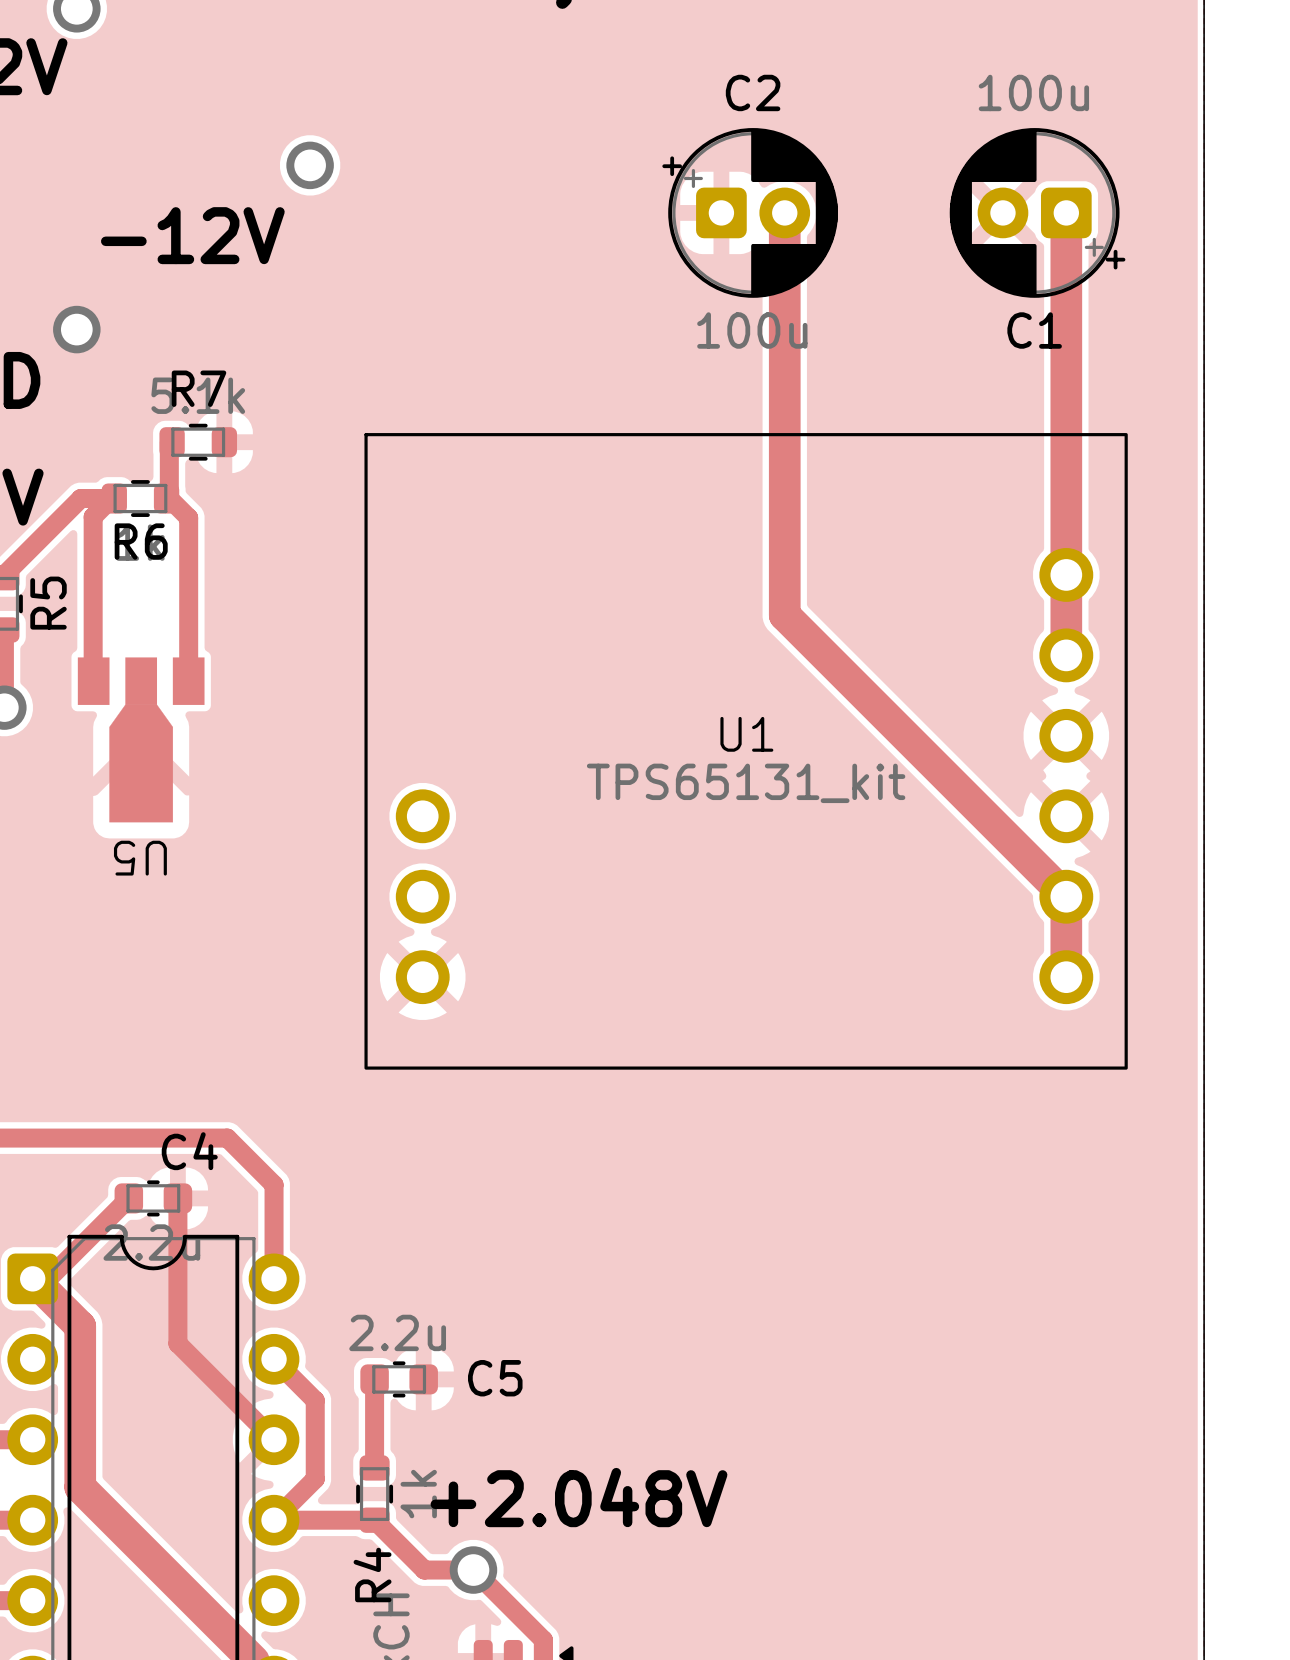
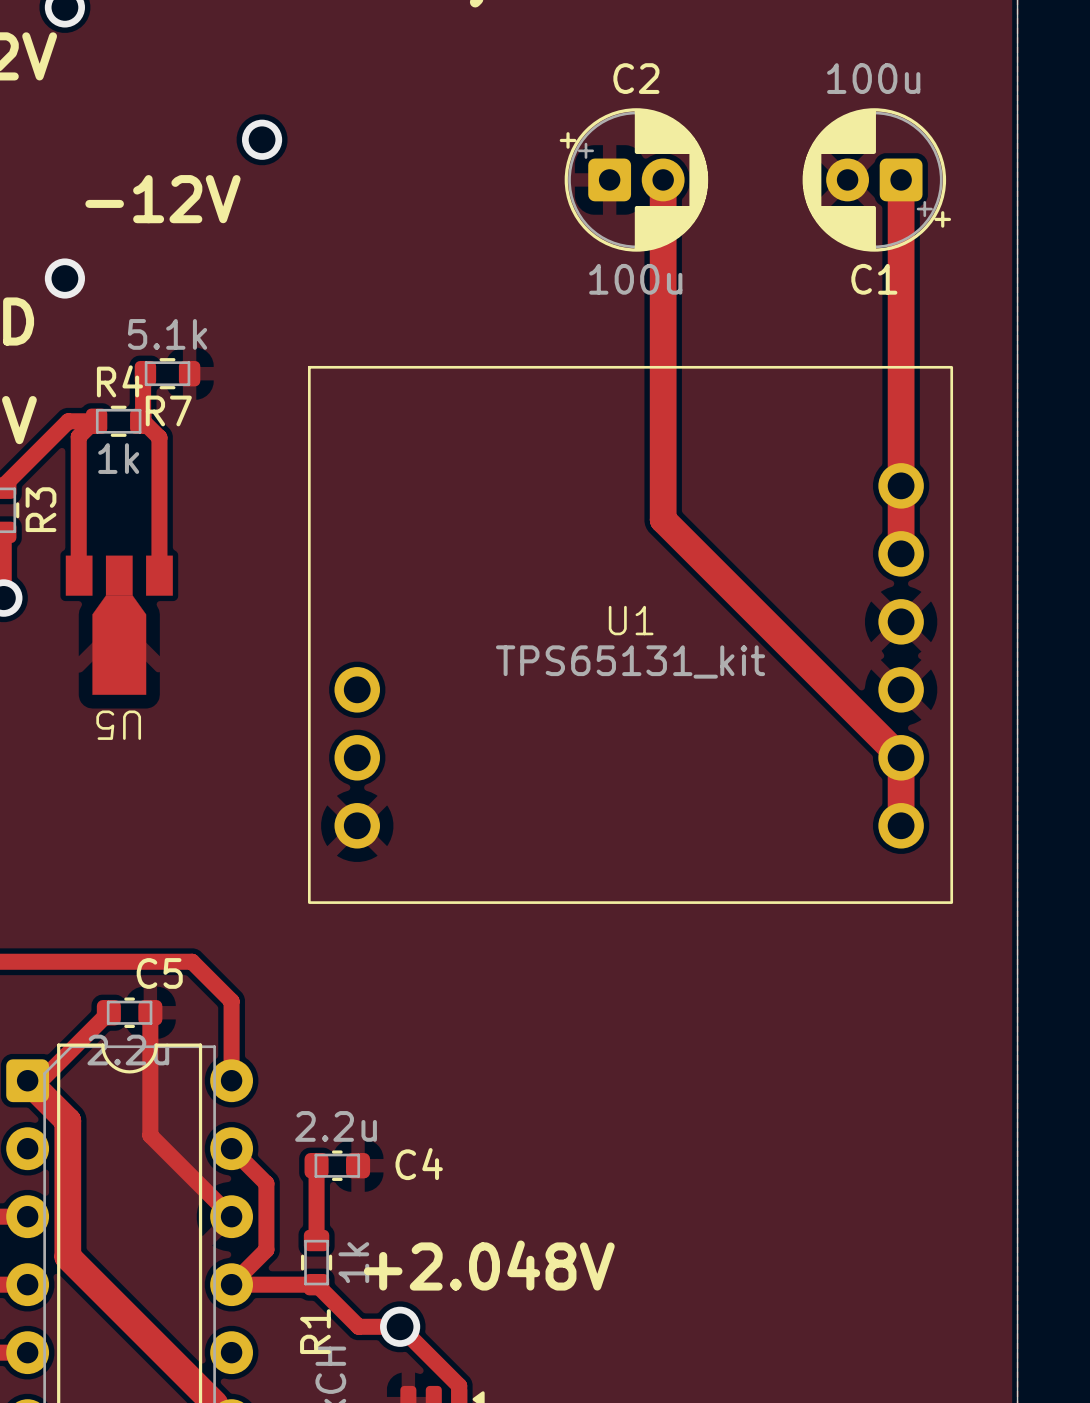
R7 name position: R7 (198, 388) -> R7 (168, 410)
R6 name: R6 (141, 541) -> R4 (119, 381)
R5 name: R5 (48, 603) -> R3 (41, 509)
C4 name: C4 (189, 1151) -> C5 (159, 973)
C5 name: C5 (495, 1378) -> C4 (419, 1164)
R4 name: R4 (372, 1575) -> R1 (315, 1331)

